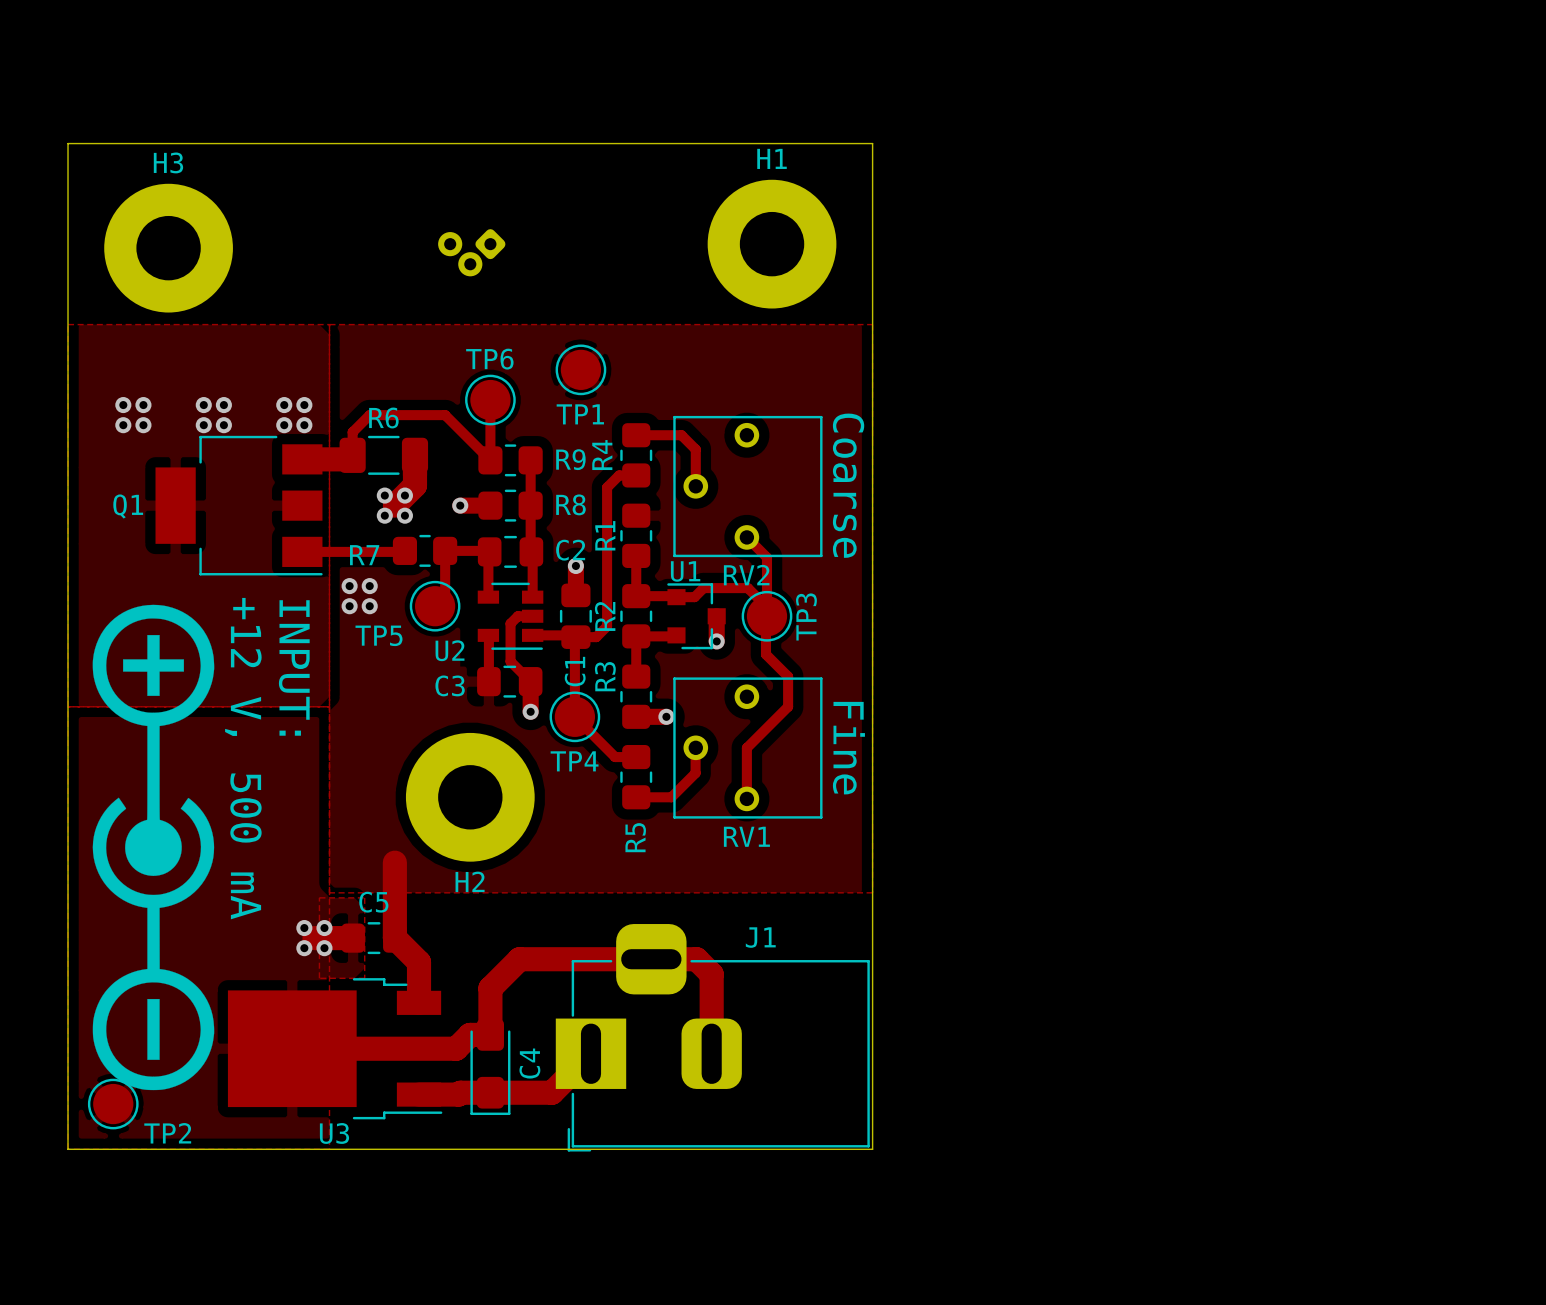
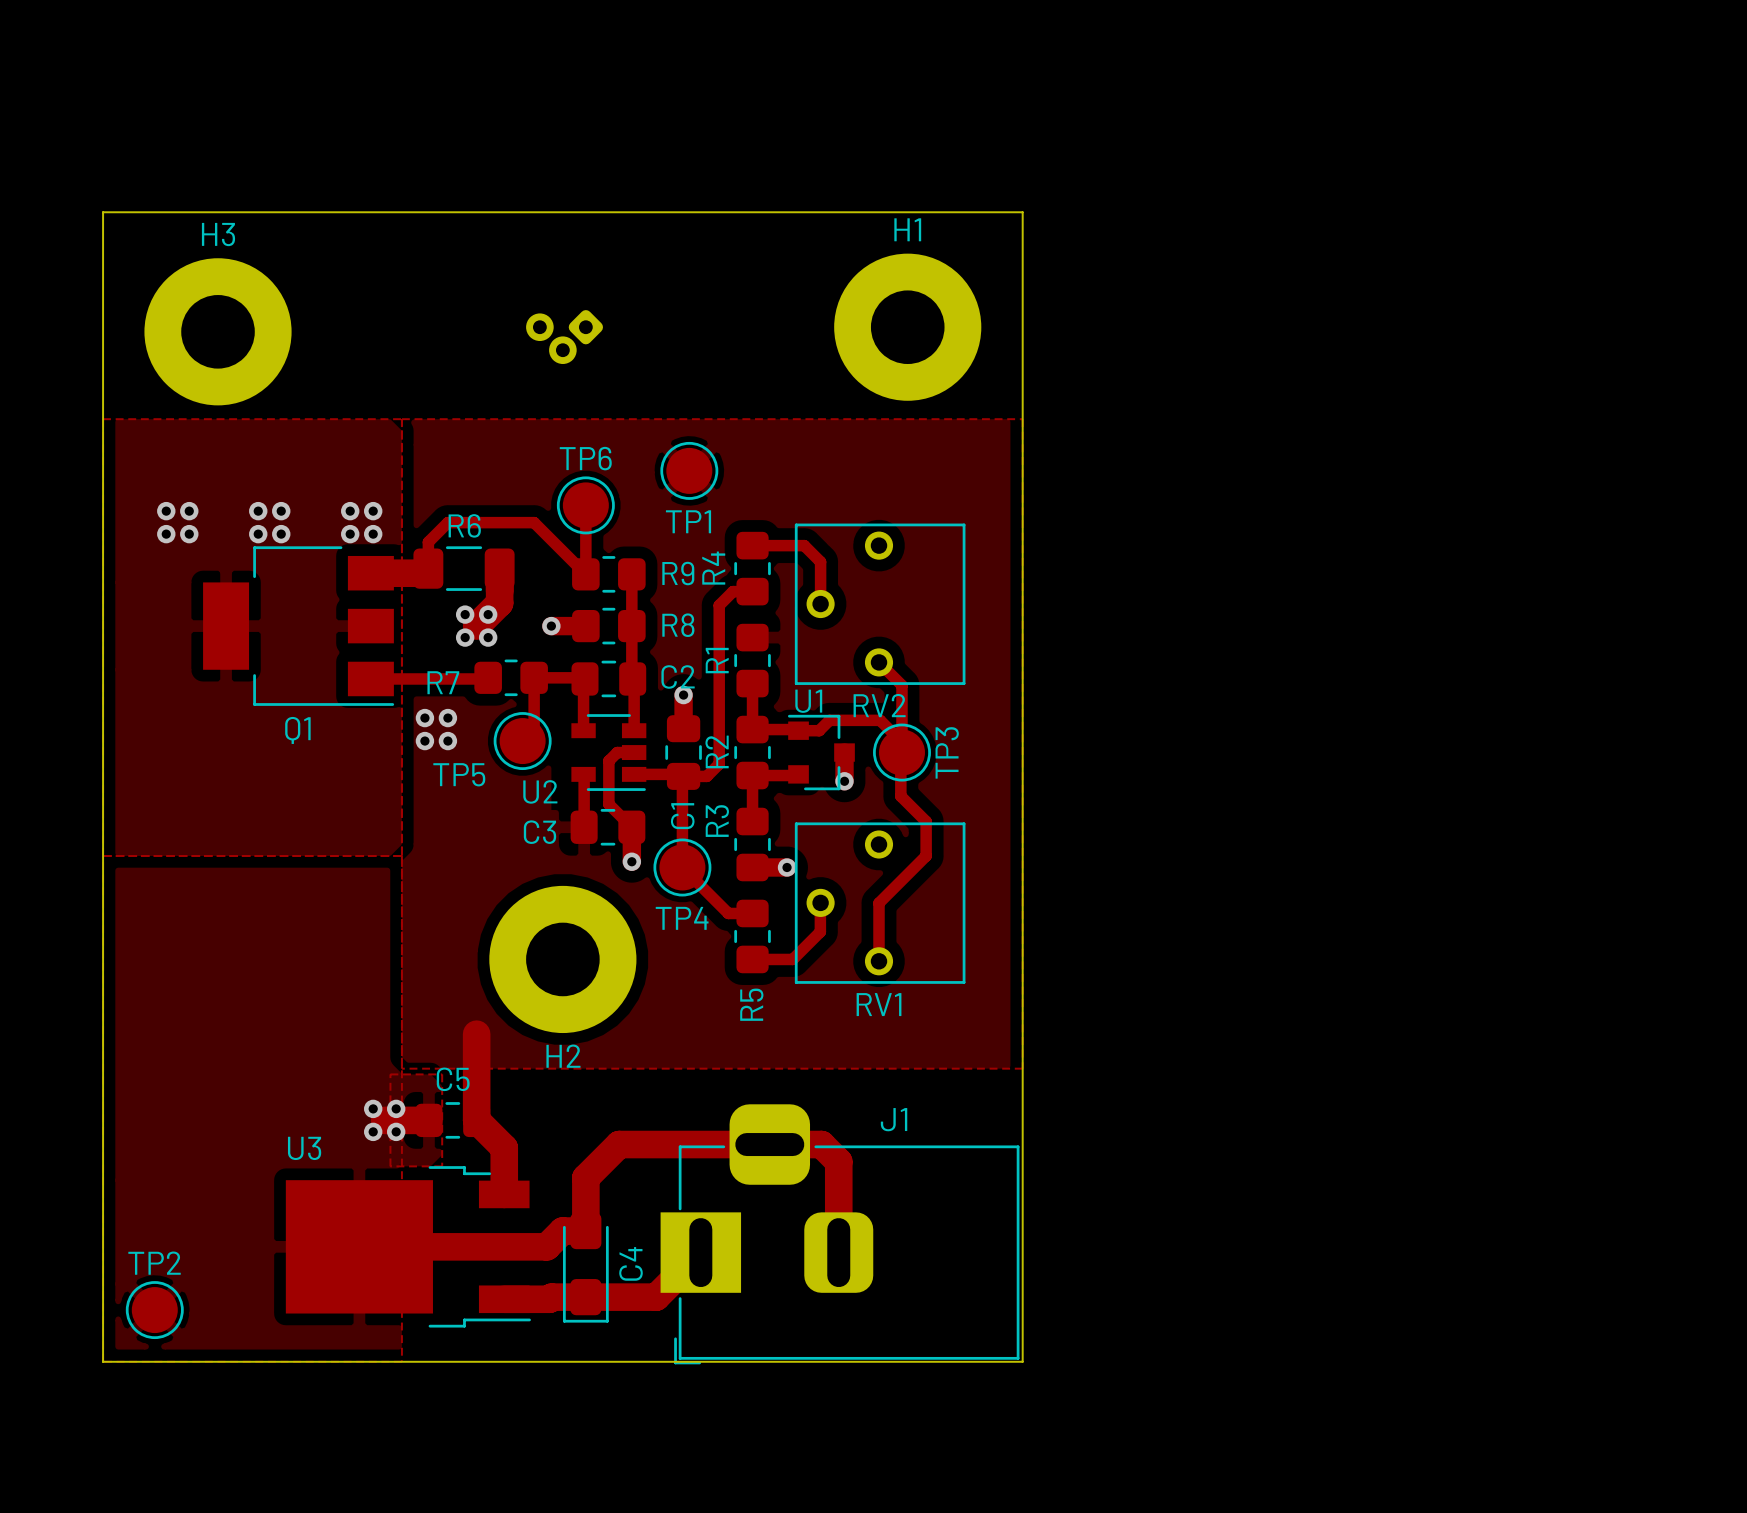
text: Coarse (848, 485) -> none
Q1 name position: Q1 (128, 506) -> Q1 (297, 730)
drawing: [92, 604, 215, 1091] -> none
text: INPUT: (294, 667) -> none
text: Fine (848, 748) -> none
text: +12 V, 500 mA (243, 758) -> none
TP2 name position: TP2 (167, 1133) -> TP2 (154, 1263)
U3 name position: U3 (334, 1133) -> U3 (304, 1148)

